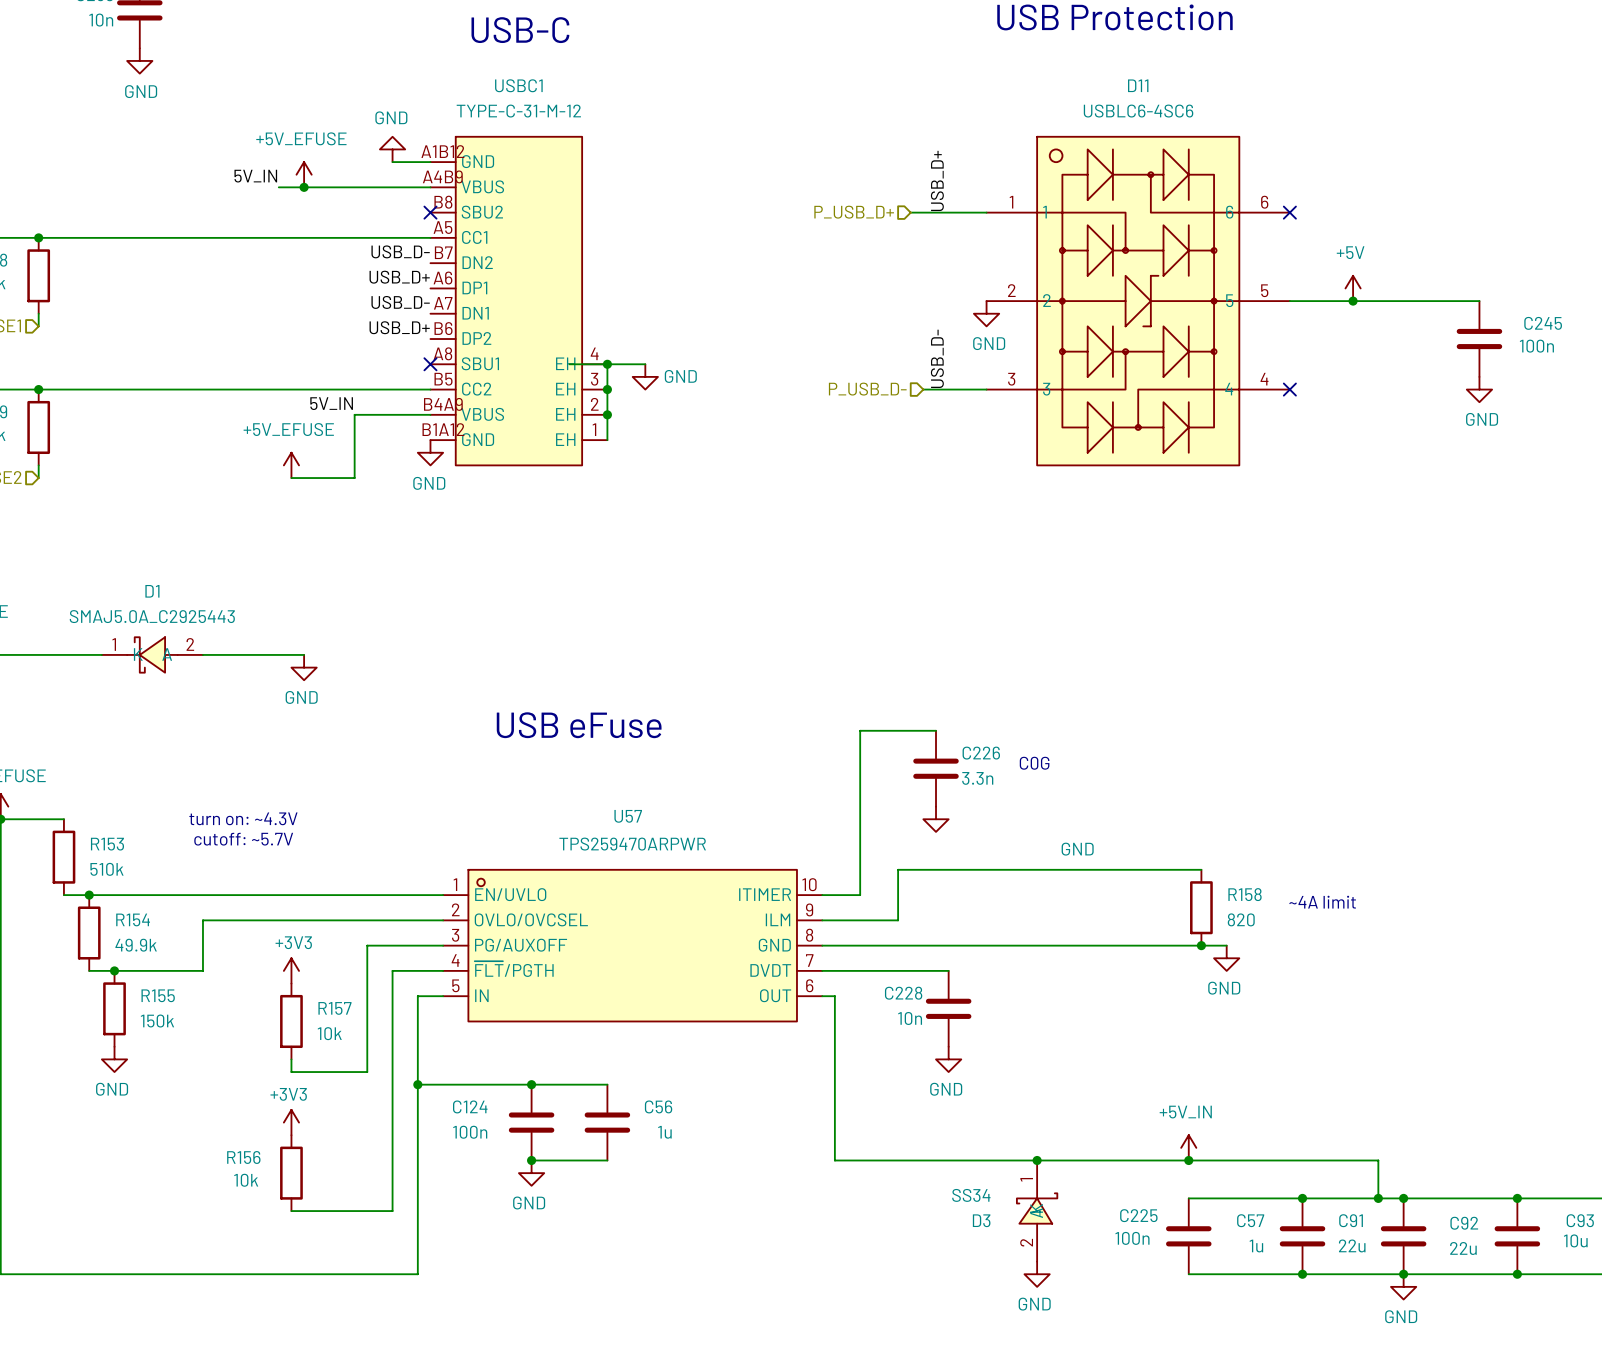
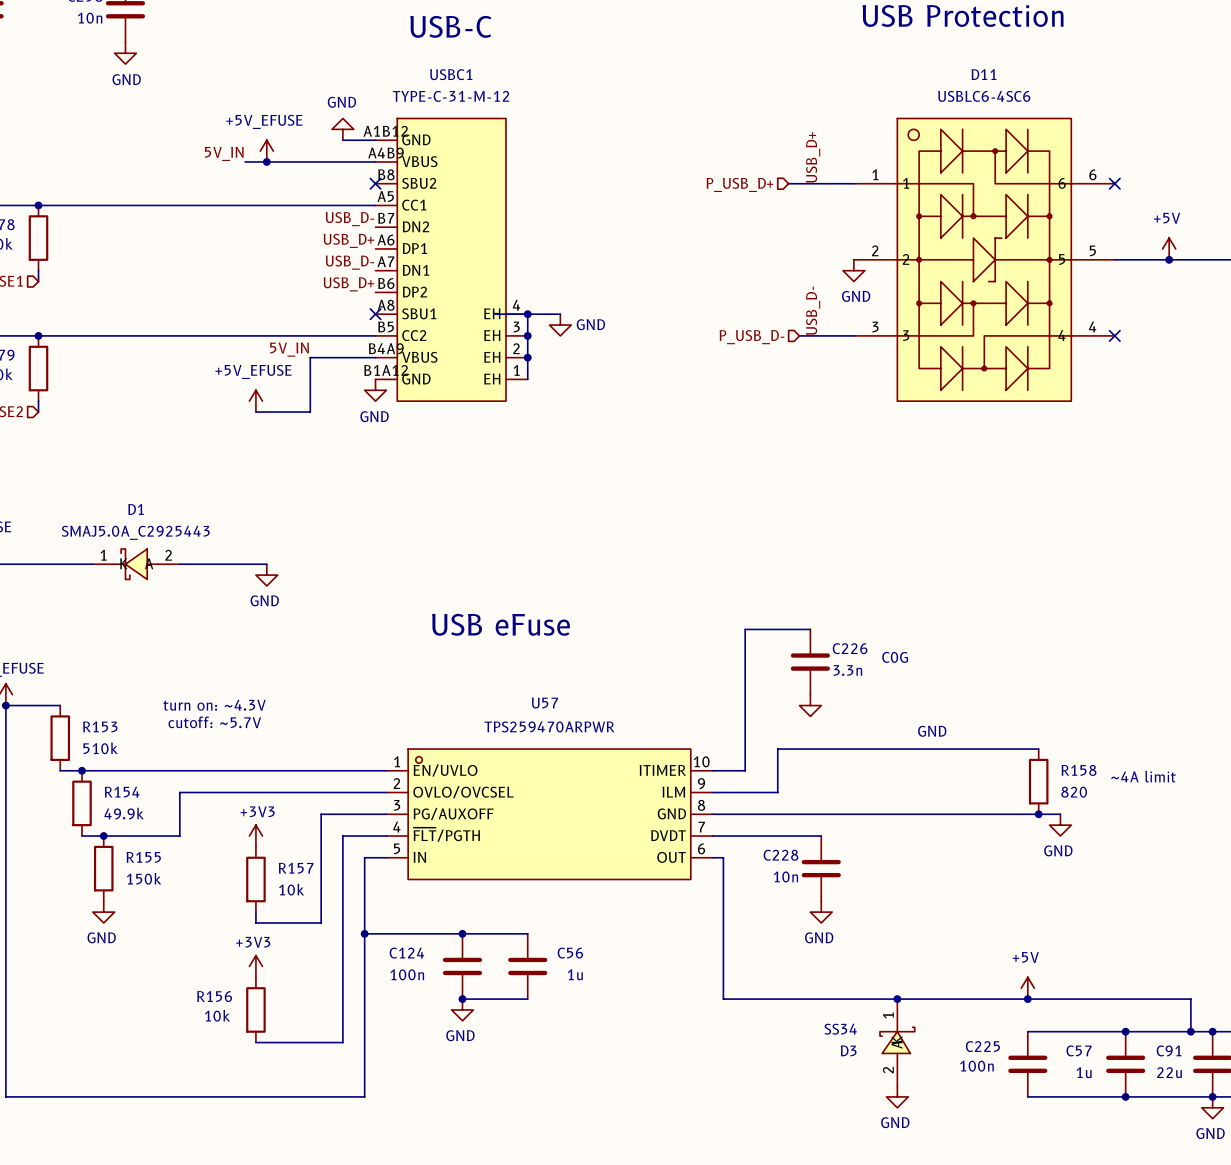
power symbol: +5V_IN (1188, 1147) -> +5V (1027, 988)

